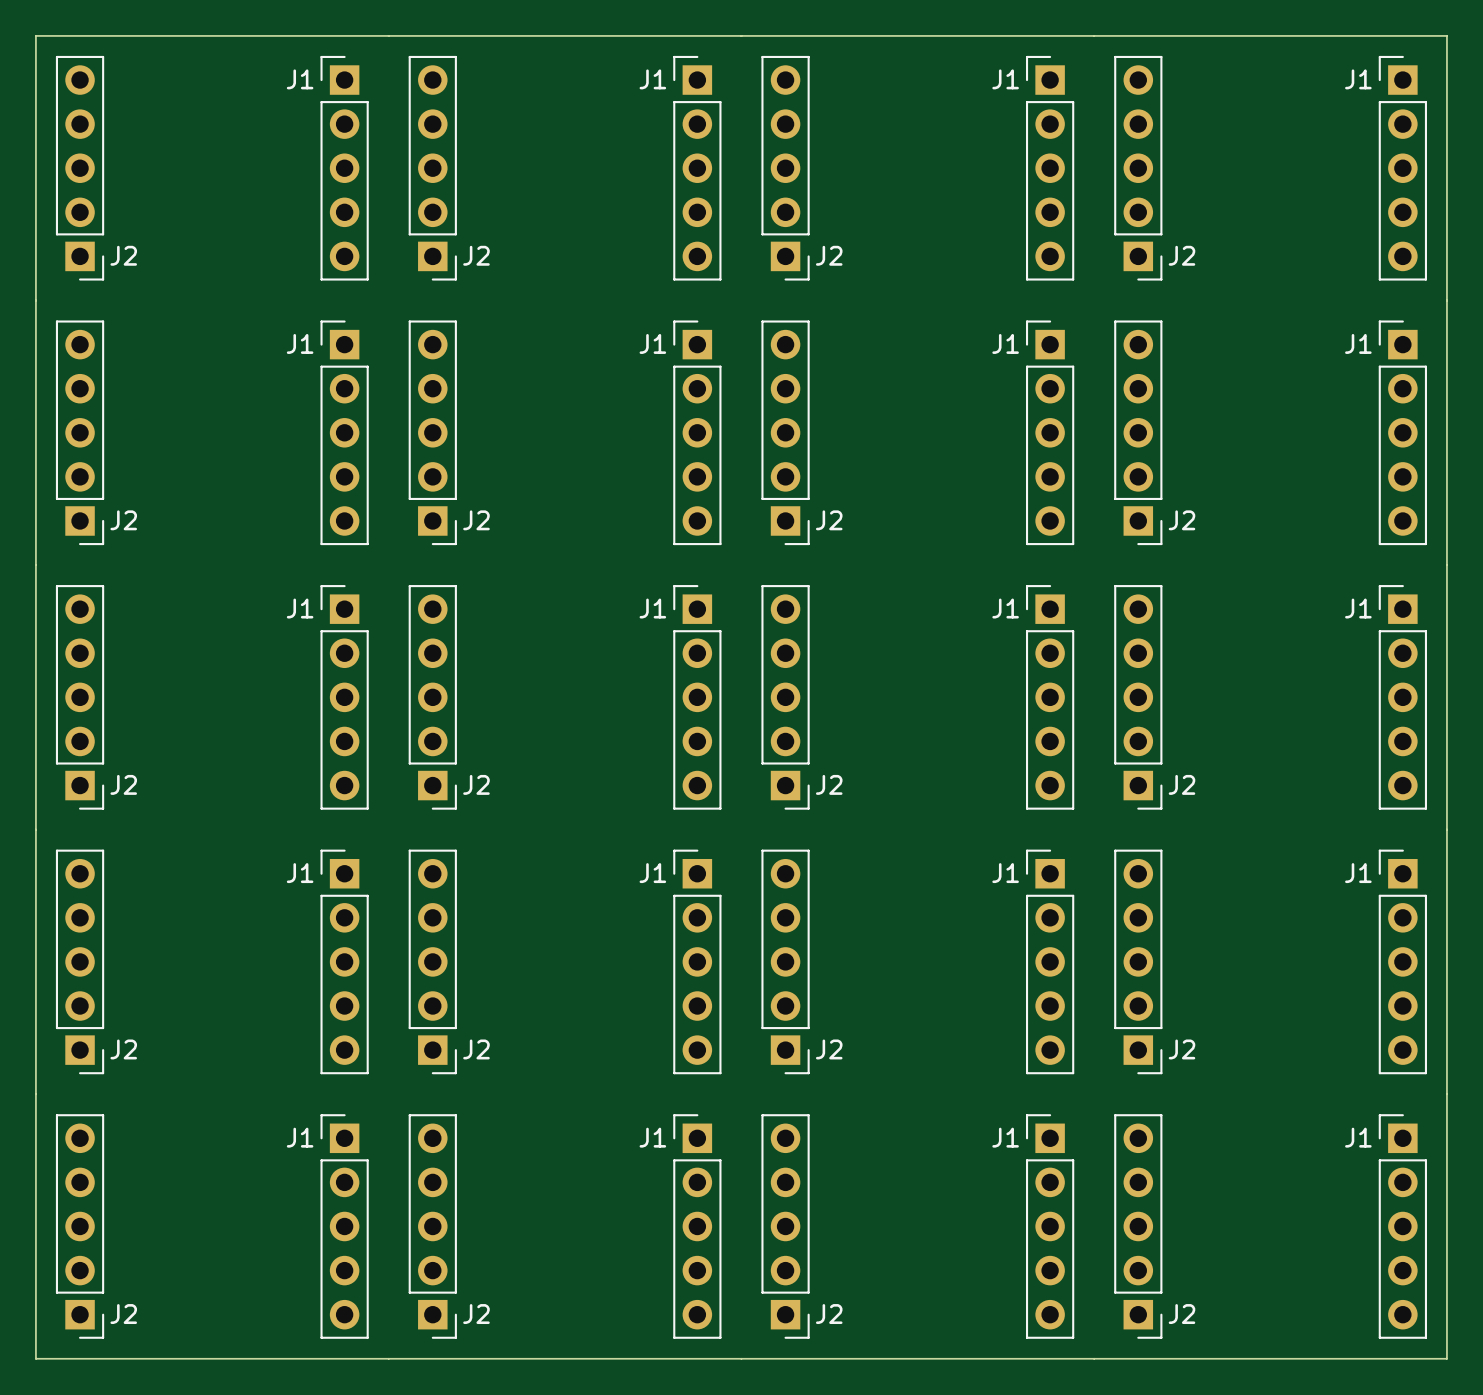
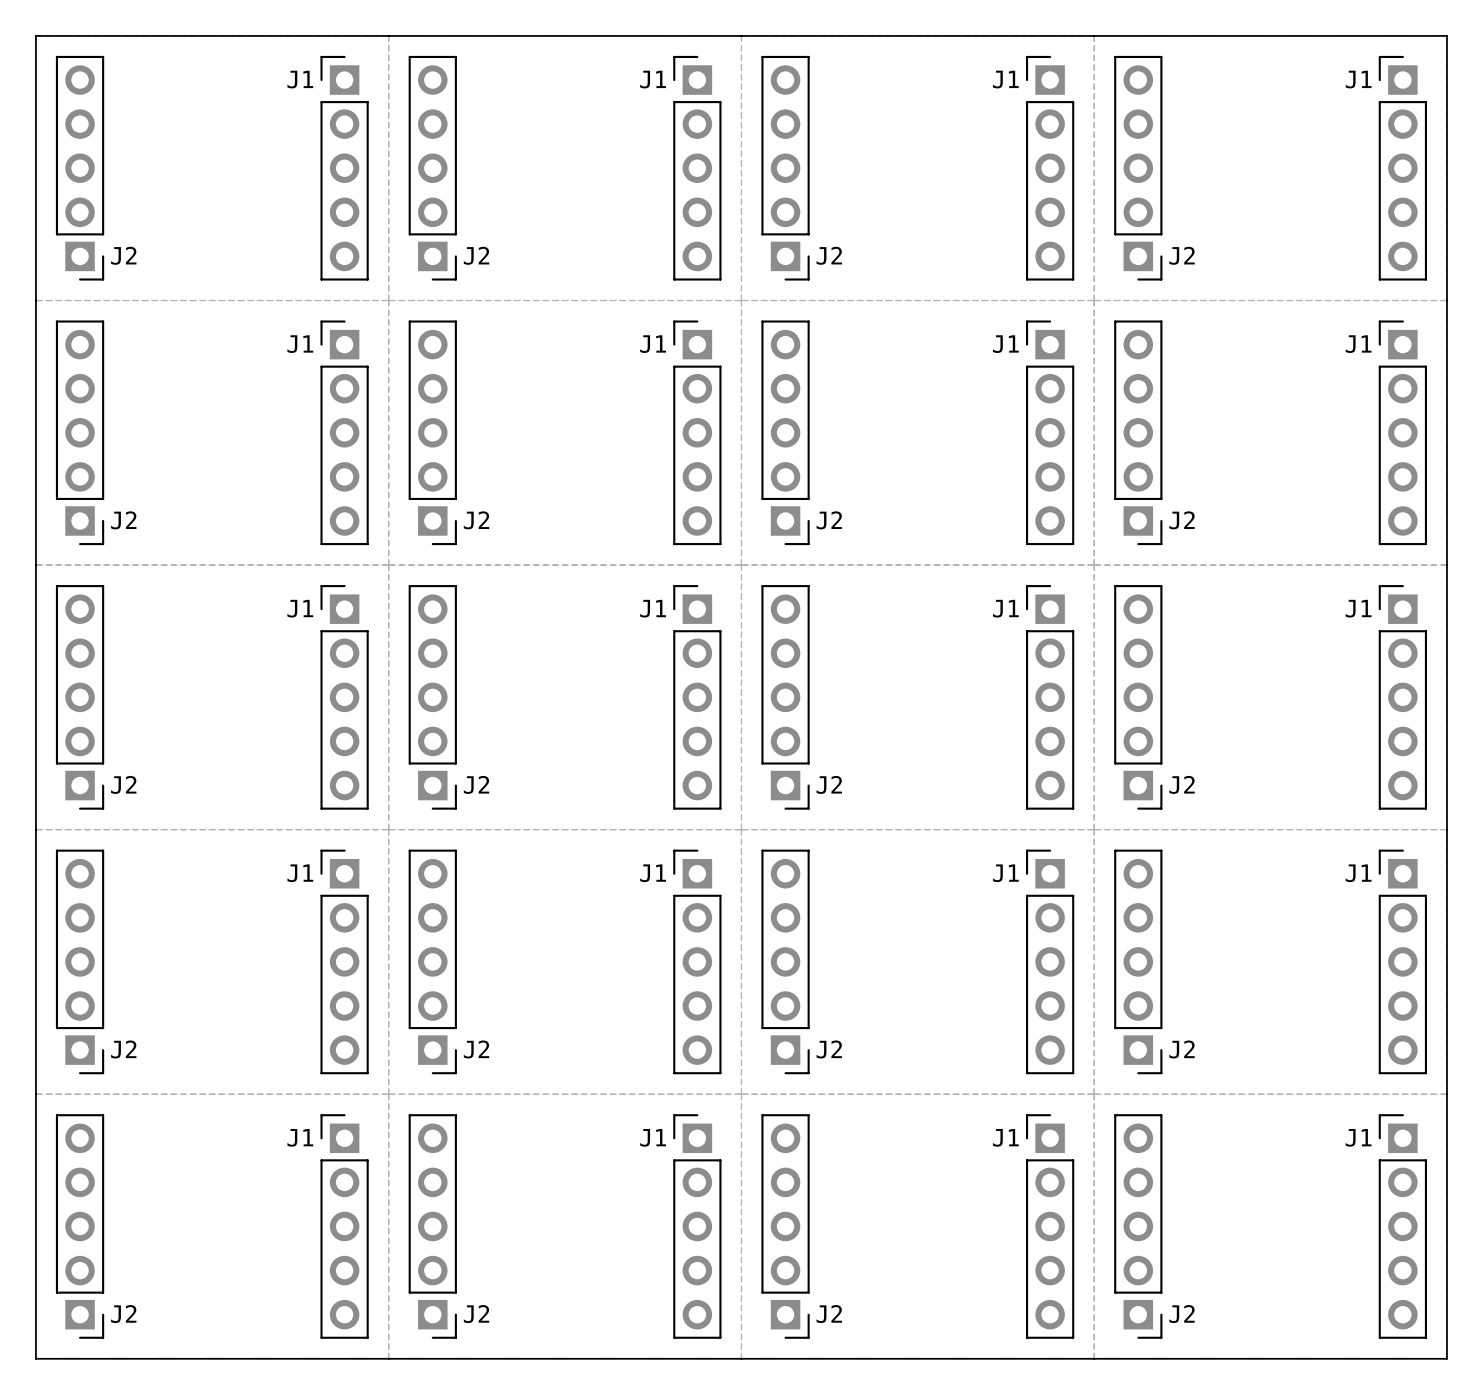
zone outline: none -> (388, 35) (388, 1358)
zone outline: none -> (741, 35) (741, 1358)
zone outline: none -> (1094, 35) (1094, 1358)
zone outline: none -> (1446, 300) (35, 300)
zone outline: none -> (1446, 565) (35, 565)
zone outline: none -> (1446, 829) (35, 829)
zone outline: none -> (1446, 1094) (35, 1094)

